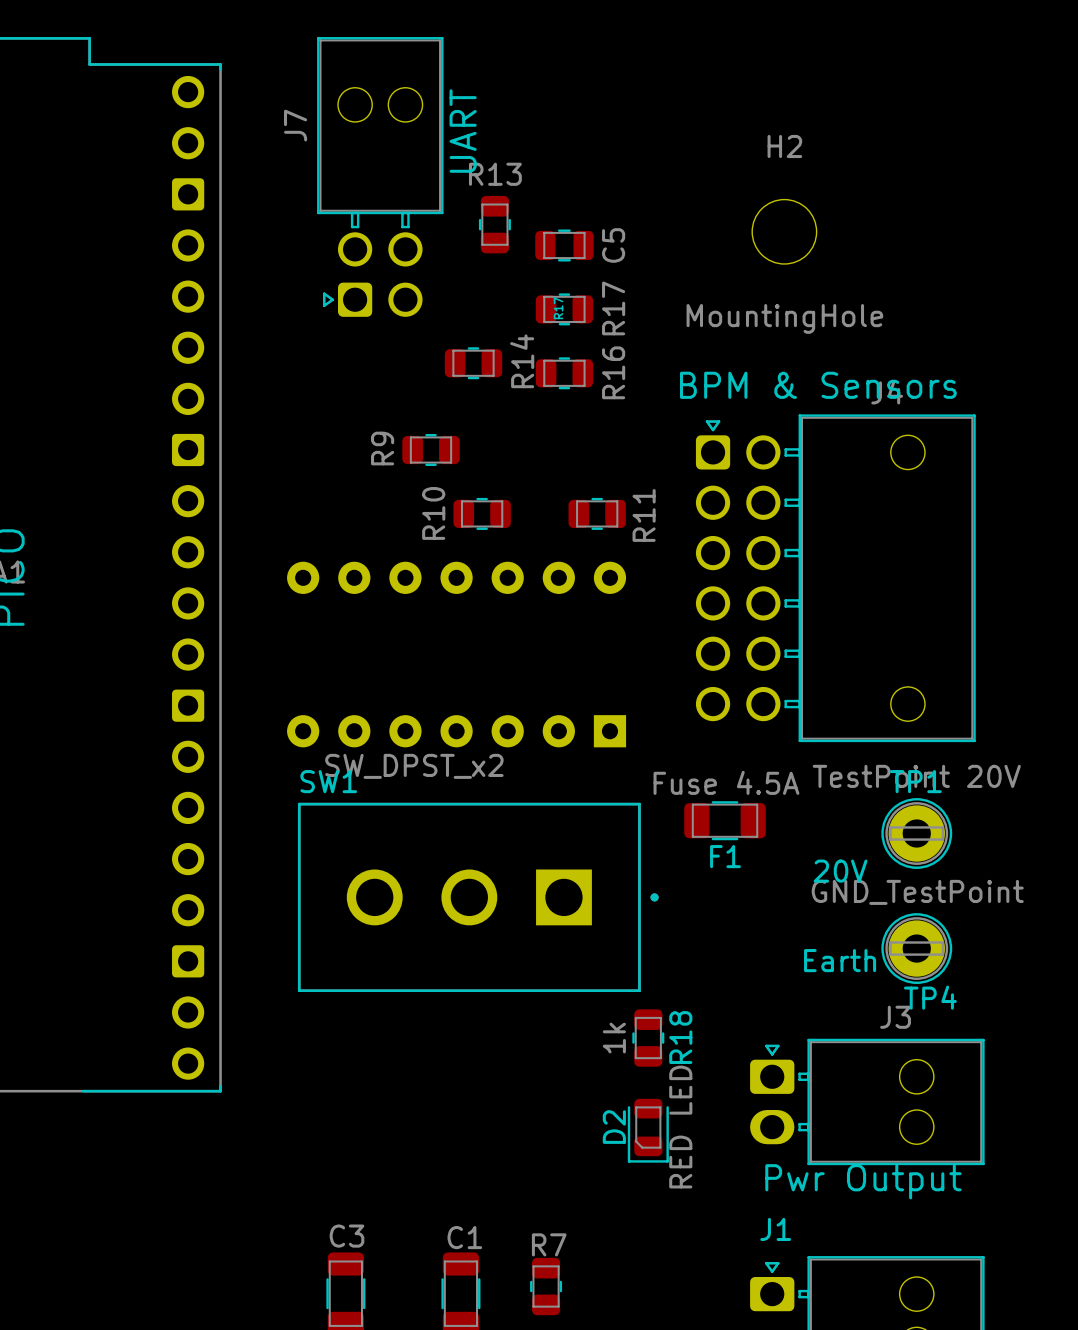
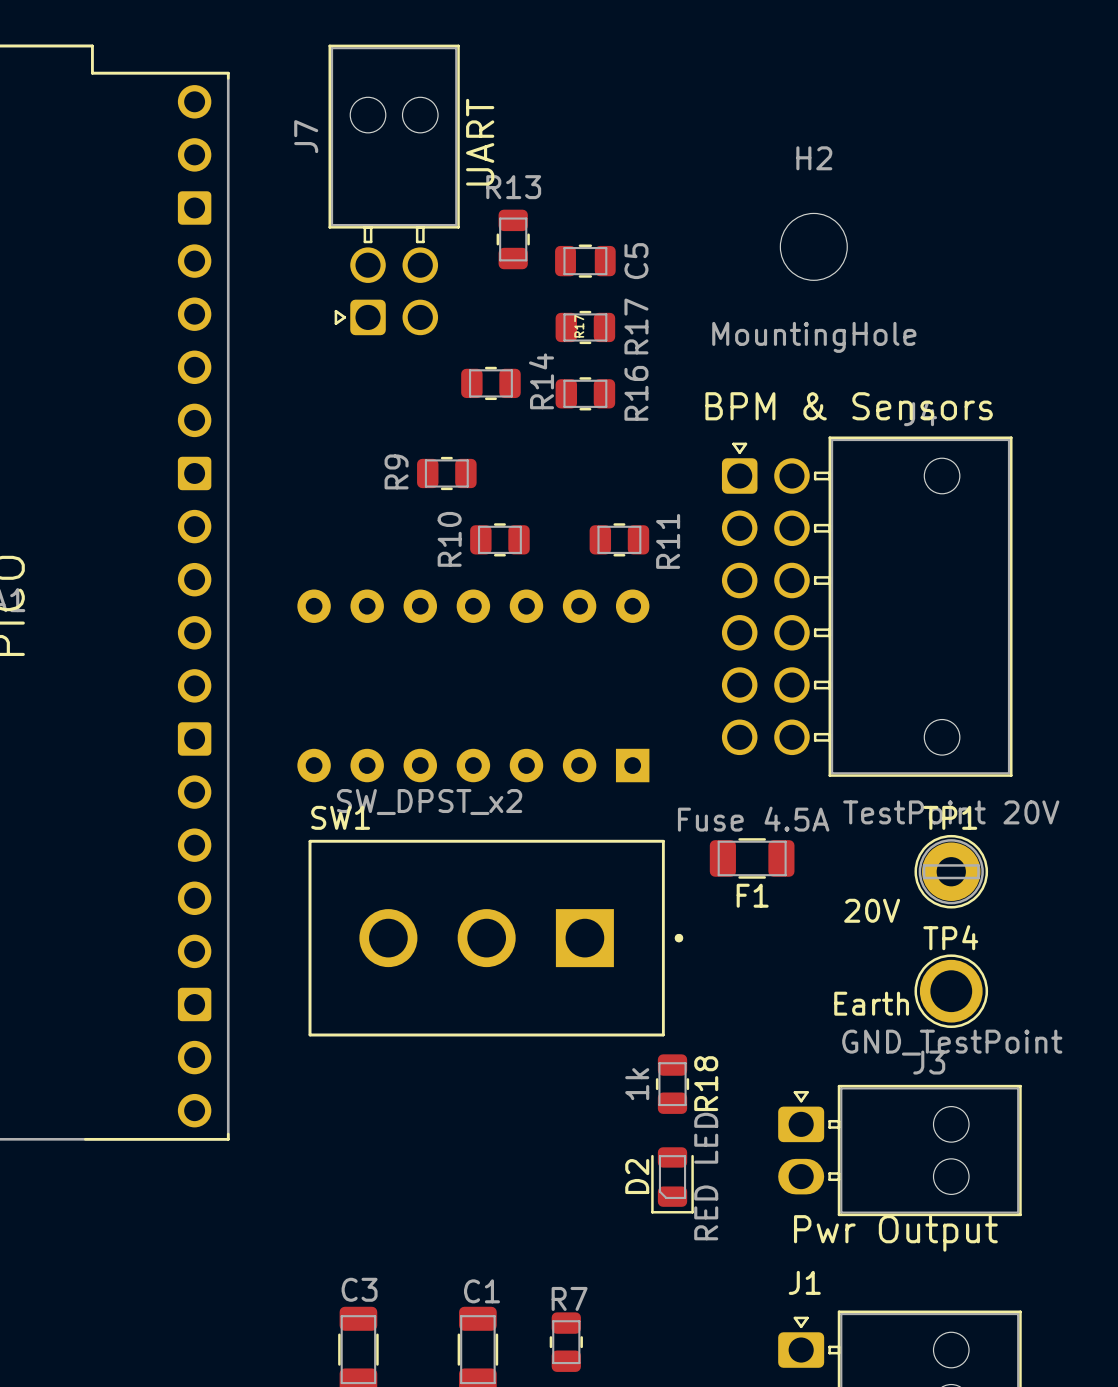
TP4 value position: GND_TestPoint (917, 892) -> GND_TestPoint (952, 1042)
TP4 footprint: [881, 913, 953, 984] -> [914, 954, 989, 1028]
TP4 name position: TP4 (930, 997) -> TP4 (950, 937)

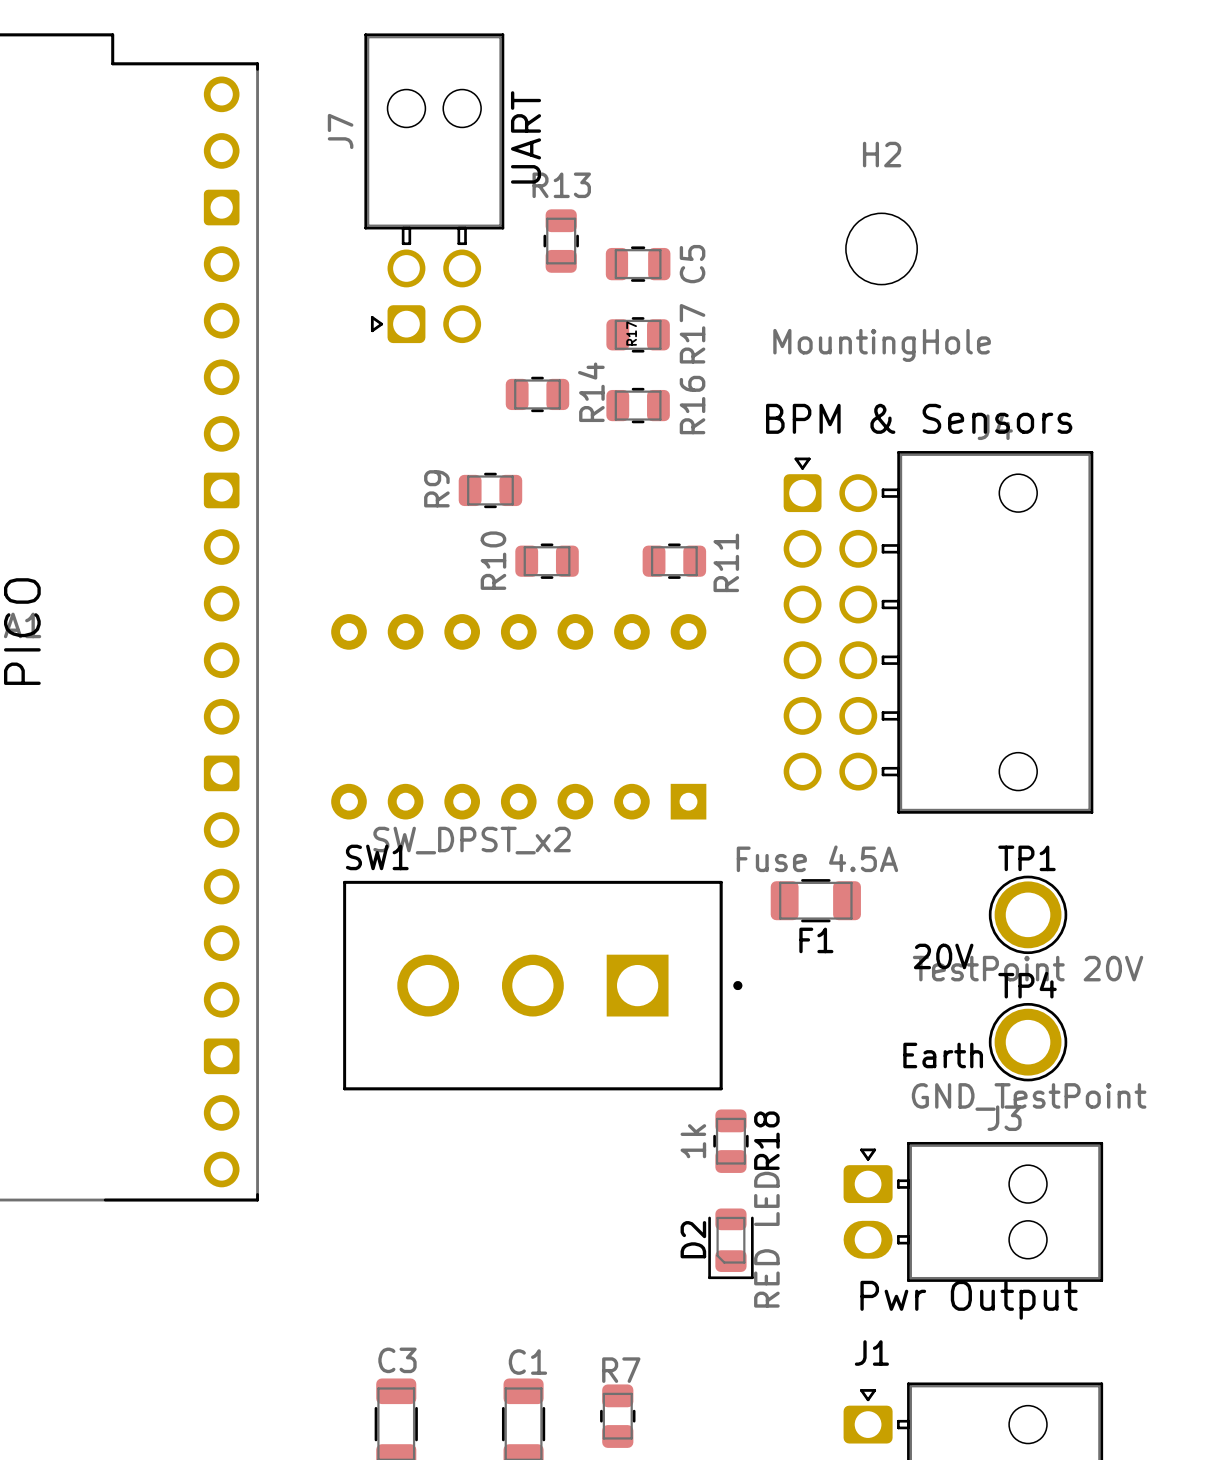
TP1 value position: TestPoint 20V (951, 812) -> TestPoint 20V (1028, 968)
TP1 footprint: [914, 834, 989, 909] -> [988, 875, 1068, 955]

